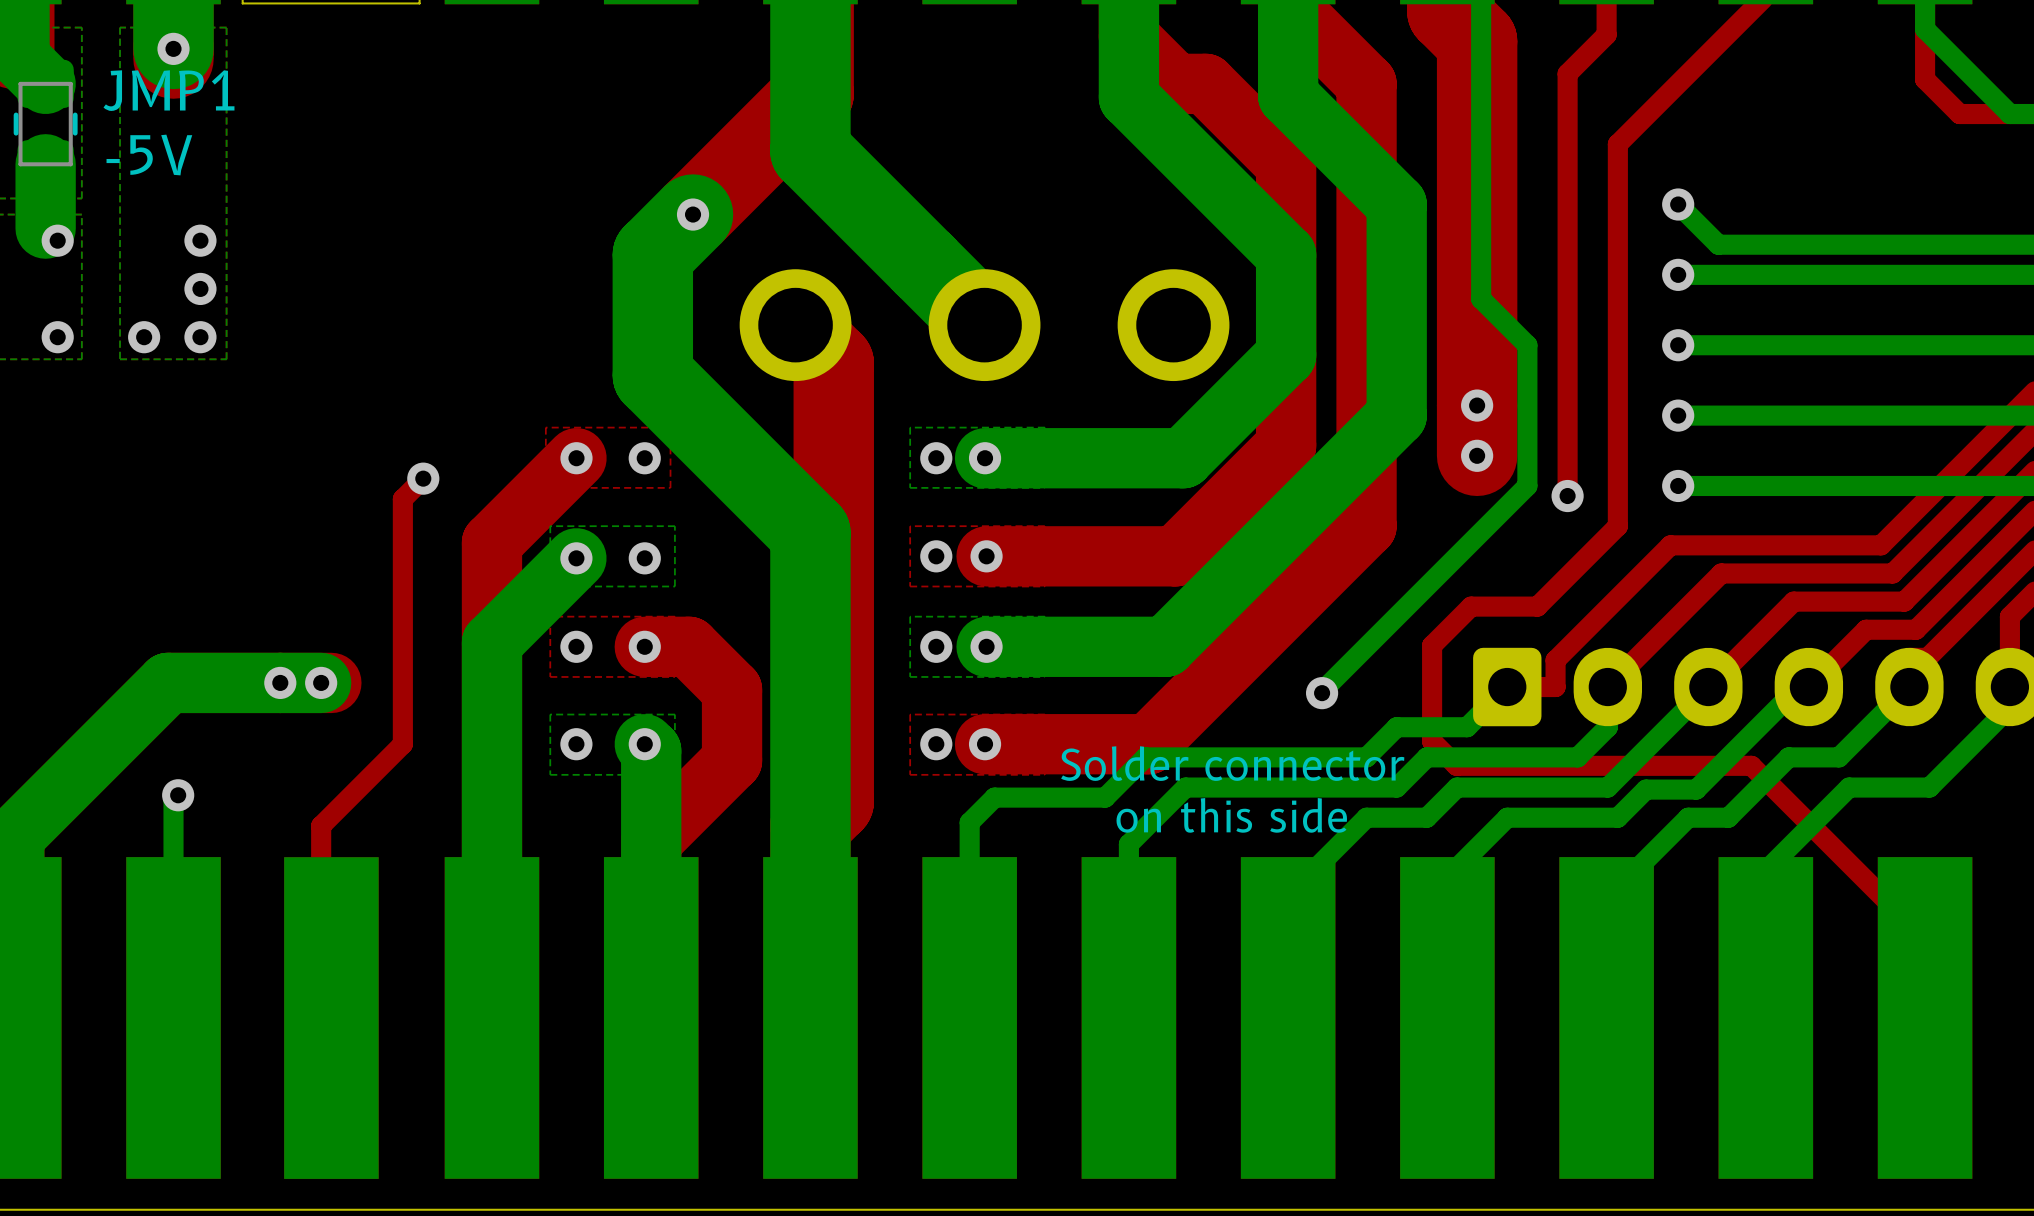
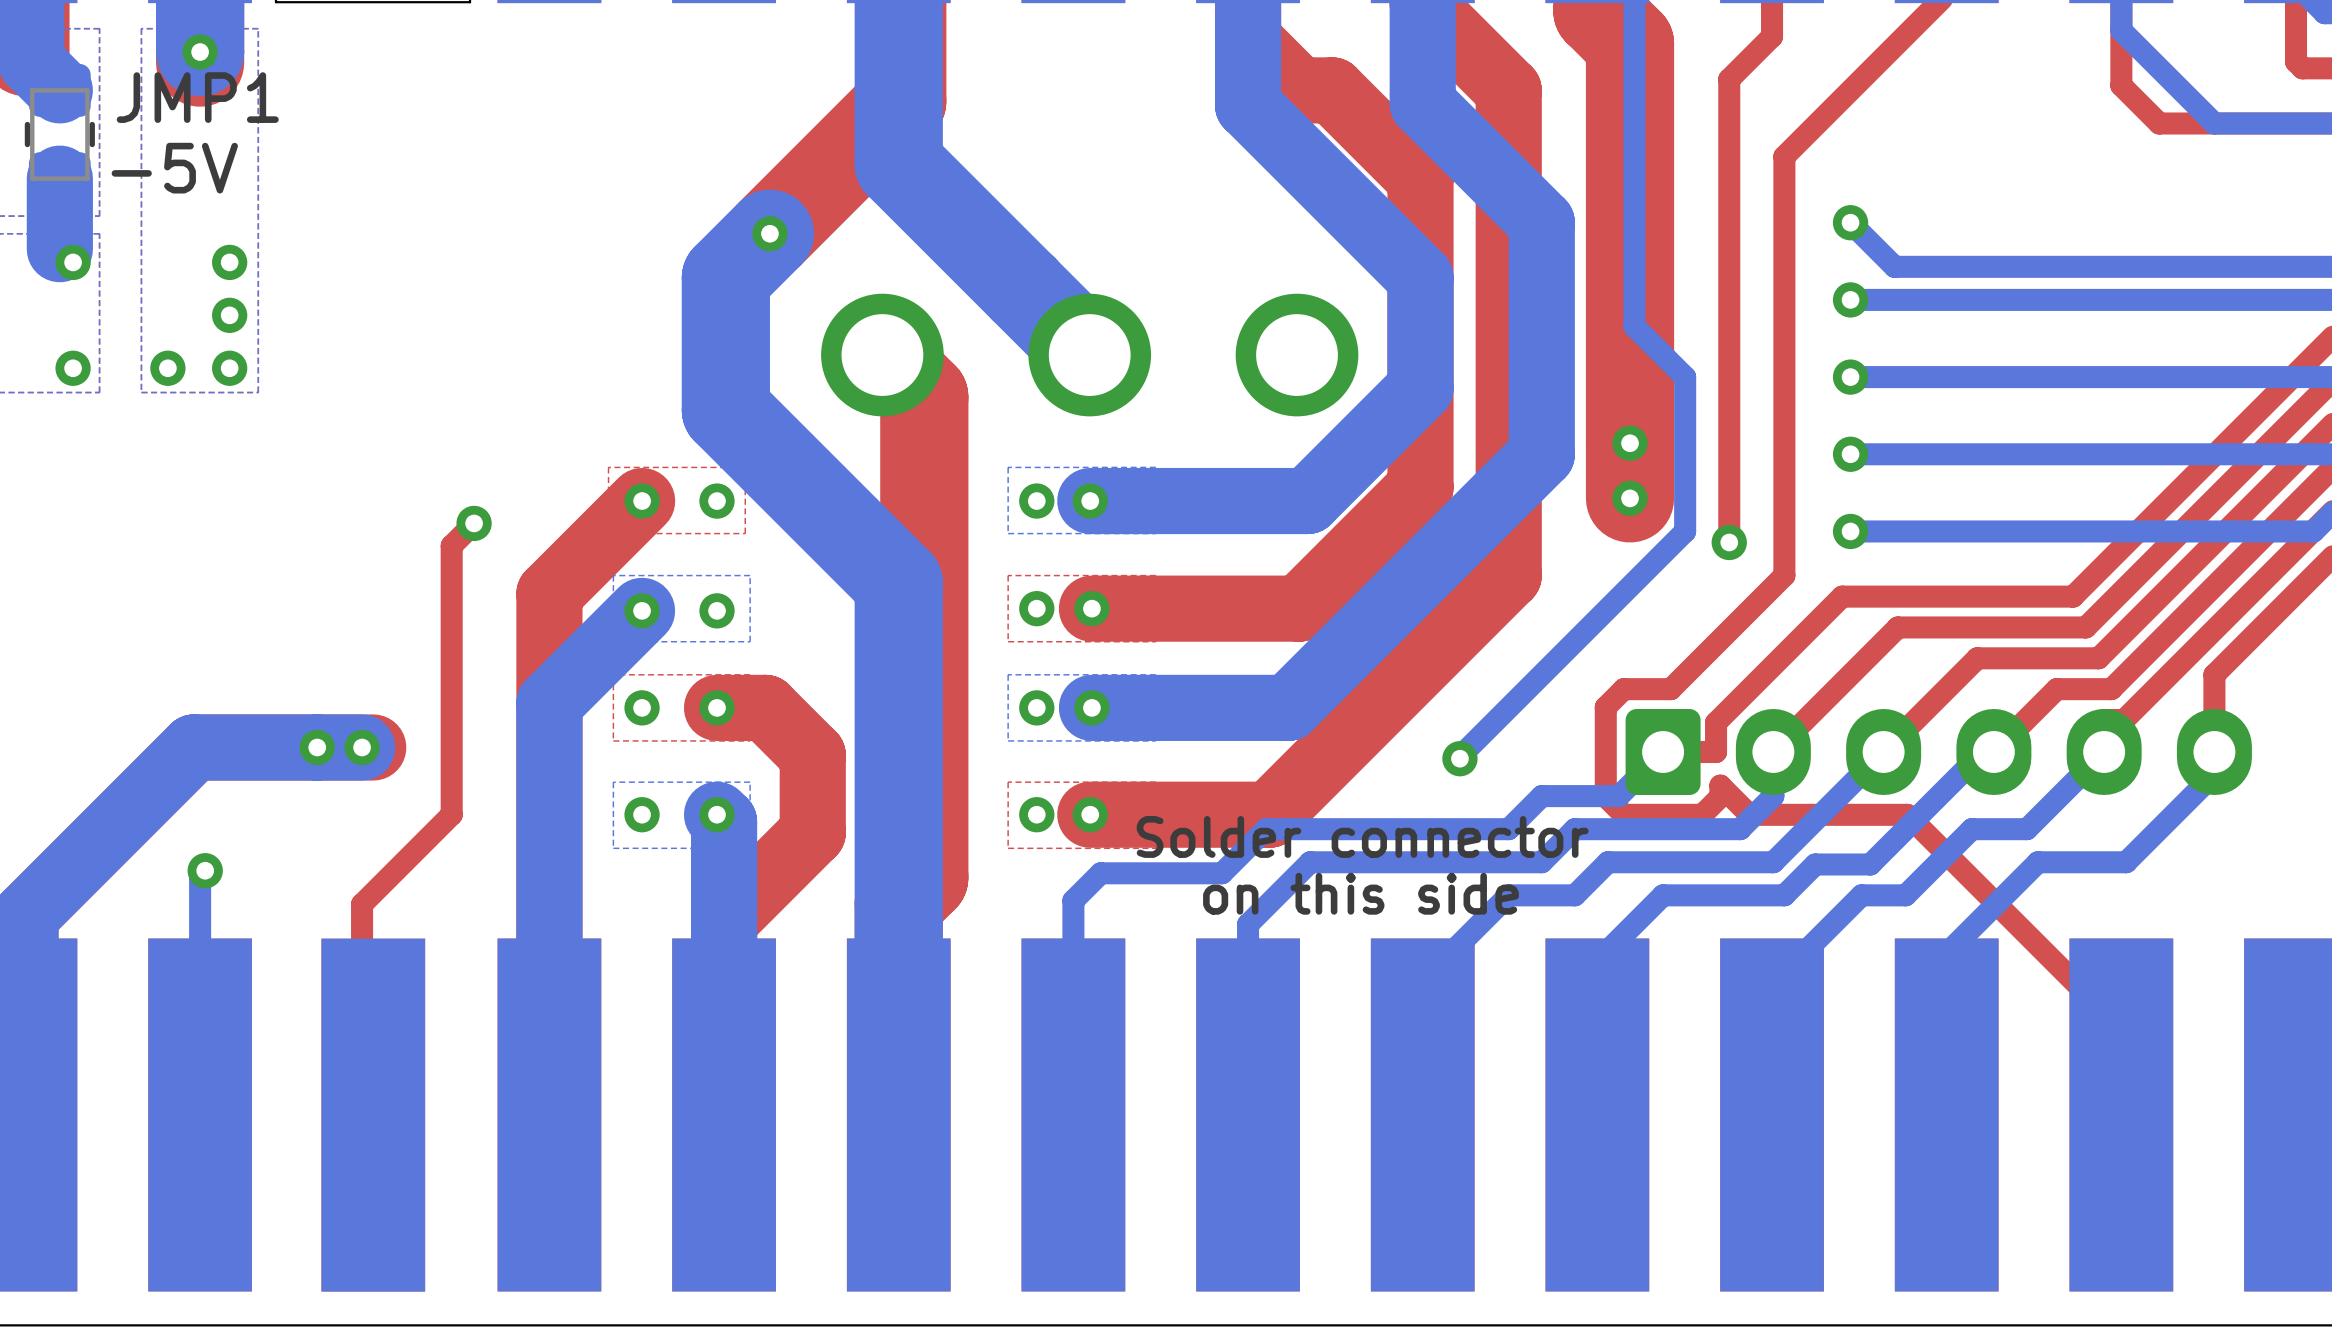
top track: (1537, 606) (1471, 606) (1432, 645) (1432, 741) (1456, 765) (1751, 765) -> (1696, 663) (1670, 689) (1623, 689) (1605, 707) (1605, 796) (1623, 814) (1702, 814) (1720, 796) (1720, 785) (1749, 814) (1907, 814) (1930, 838)

